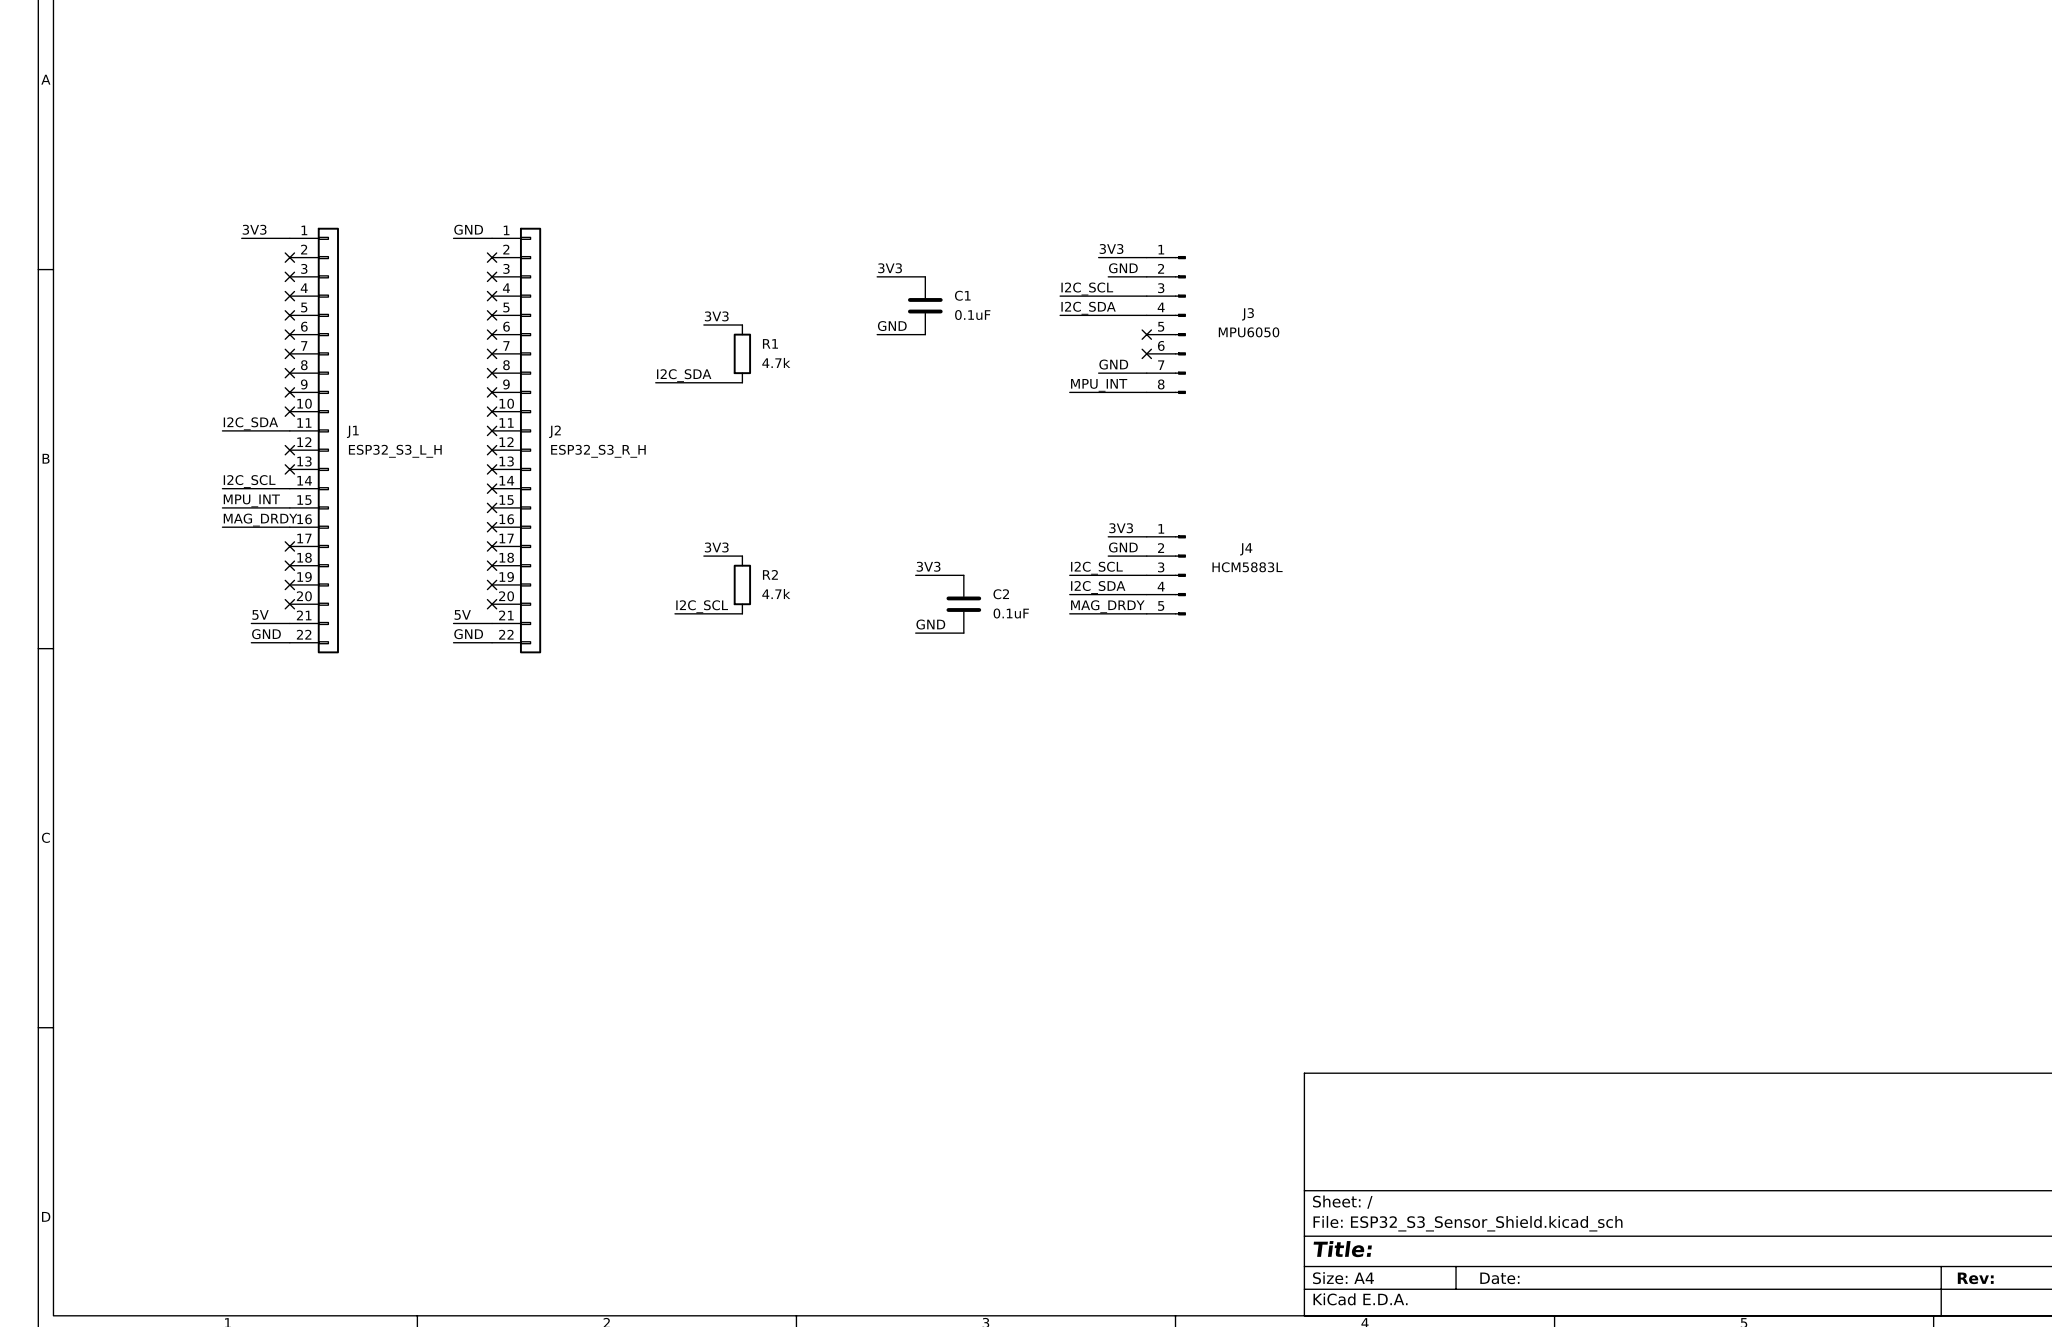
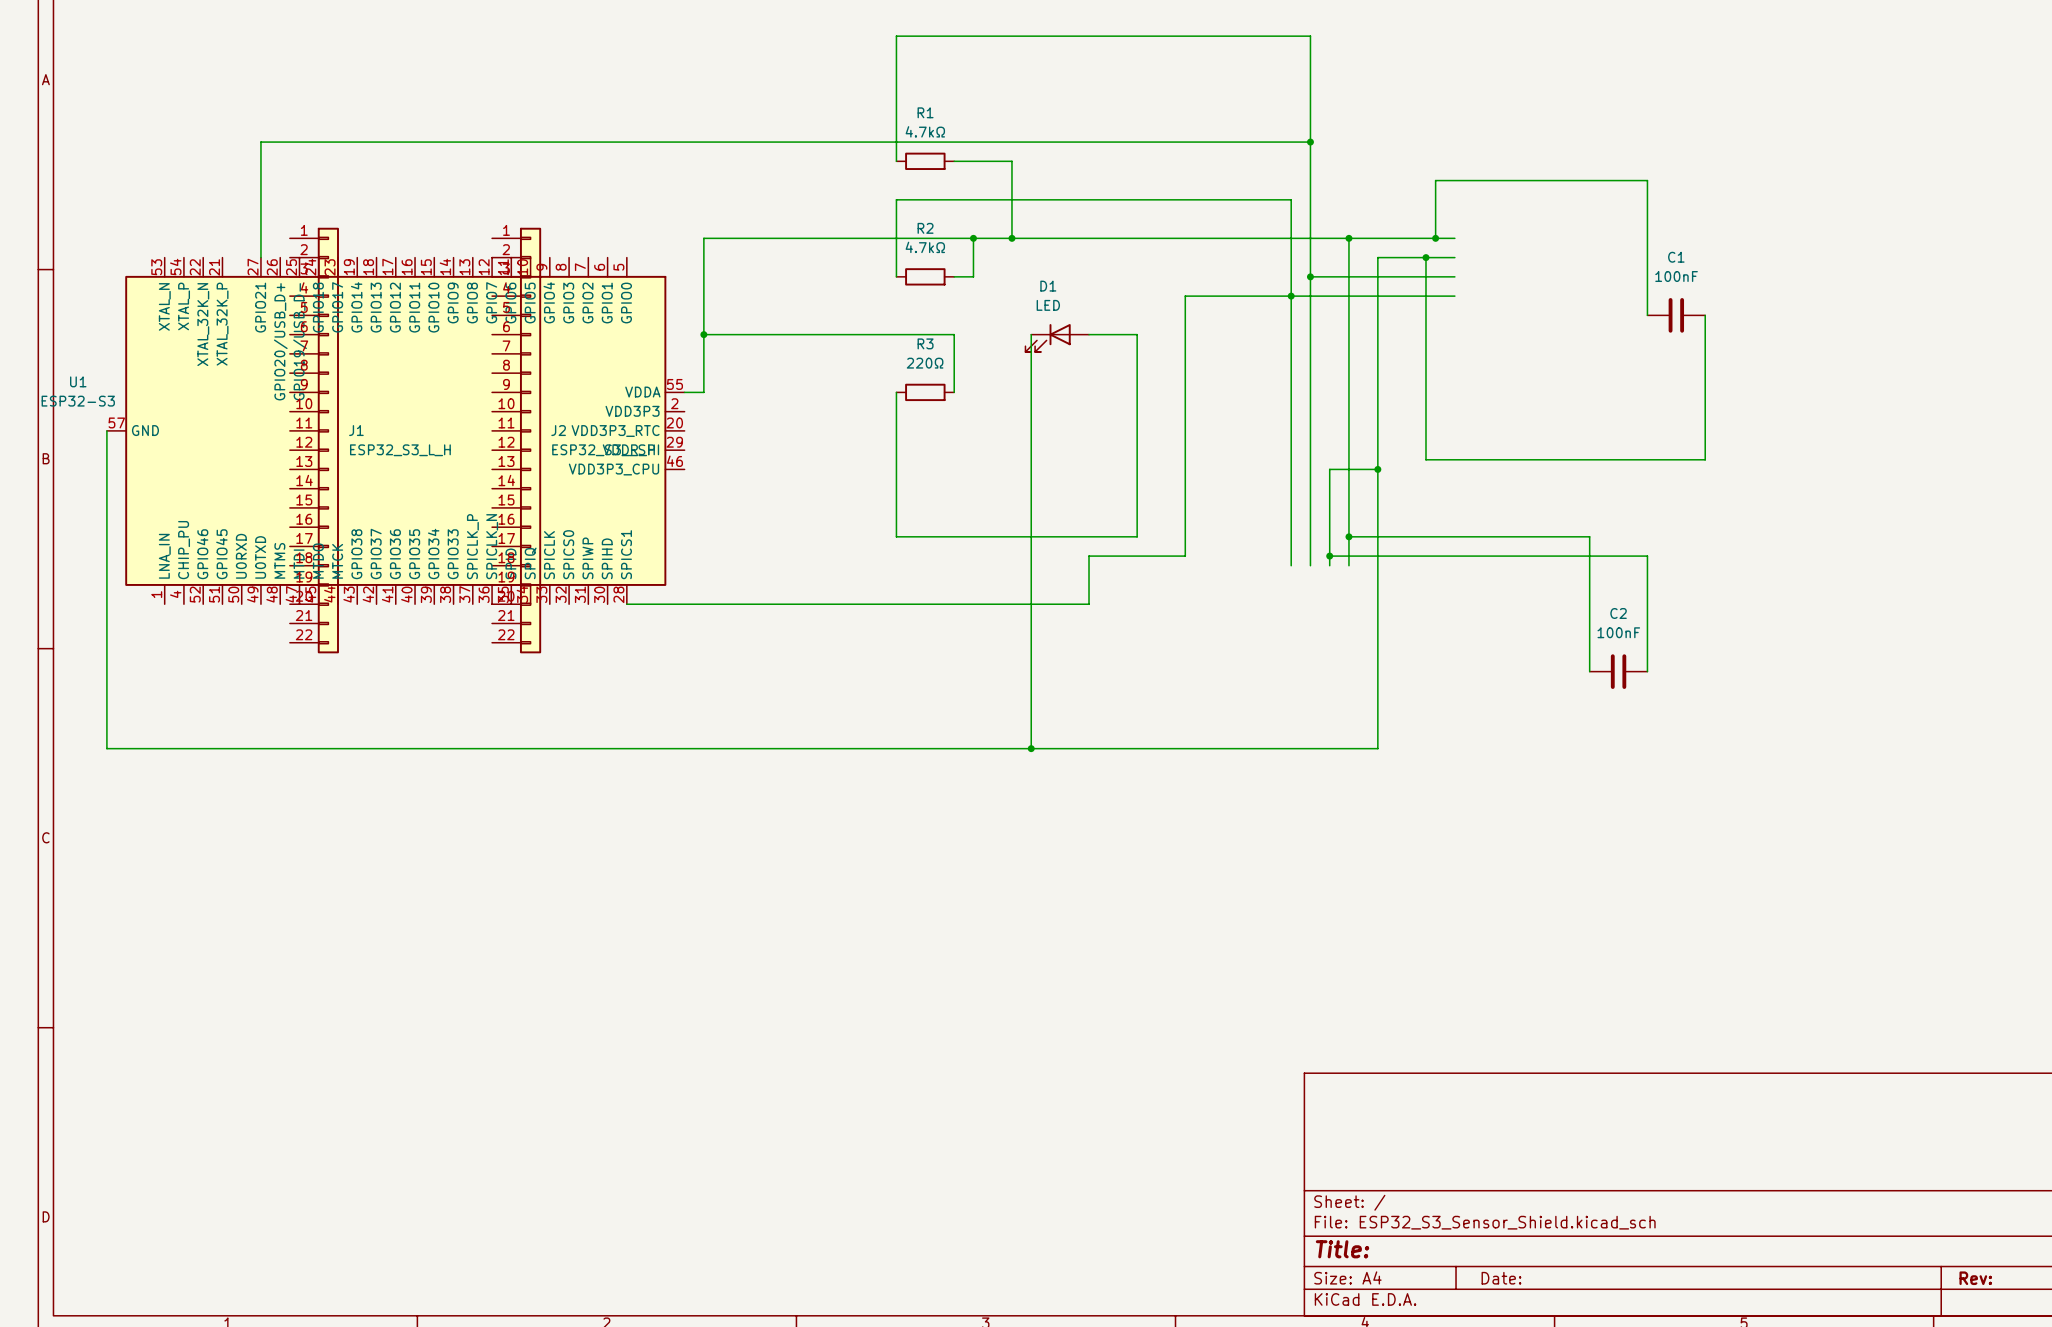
wire: none -> (1310, 142) (260, 142) (260, 257)
junction: none -> (1310, 142)
wire: none -> (896, 161) (896, 36) (1310, 36) (1310, 565)
wire: none -> (954, 161) (1011, 161) (1011, 238)
label: 3V3 (254, 229) -> none
label: GND (468, 229) -> none
wire: (241, 238) (289, 238) -> none
wire: (453, 238) (492, 238) -> none
wire: none -> (973, 238) (973, 276) (954, 276)
junction: none -> (973, 238)
junction: none -> (1011, 238)
wire: none -> (1348, 238) (1348, 565)
junction: none -> (1348, 238)
wire: none -> (1435, 238) (1435, 180) (1647, 180) (1647, 315)
junction: none -> (1435, 238)
wire: none -> (1454, 238) (703, 238) (703, 392) (684, 392)
label: 3V3 (1111, 249) -> none
no-connect mark: (289, 257) -> none
no-connect mark: (492, 257) -> none
wire: (1098, 257) (1146, 257) -> none
wire: none -> (1425, 257) (1425, 459) (1705, 459) (1705, 315)
junction: none -> (1425, 257)
wire: none -> (1454, 257) (1377, 257) (1377, 748) (106, 748) (106, 430)
label: 3V3 (890, 268) -> none
label: GND (1123, 268) -> none
no-connect mark: (289, 276) -> none
no-connect mark: (492, 276) -> none
wire: (877, 276) (925, 276) -> none
wire: none -> (896, 276) (896, 199) (1291, 199) (1291, 565)
wire: (1108, 276) (1146, 276) -> none
wire: none -> (1310, 276) (1454, 276)
junction: none -> (1310, 276)
label: I2C_SCL (1087, 288) -> none
C1 name position: C1 (962, 295) -> C1 (1676, 257)
no-connect mark: (289, 296) -> none
no-connect mark: (492, 296) -> none
wire: (1060, 296) (1146, 296) -> none
junction: none -> (1291, 296)
wire: none -> (1454, 296) (1185, 296) (1185, 556) (1146, 556)
C1 rotation: 0° (925, 305) -> 90° clockwise (1676, 315)
C1 position: (925, 305) -> (1676, 315)
label: I2C_SDA (1088, 308) -> none
no-connect mark: (289, 315) -> none
no-connect mark: (492, 315) -> none
C1 value: 0.1uF (972, 315) -> 100nF (1676, 276)
wire: (1060, 315) (1146, 315) -> none
label: 3V3 (716, 316) -> none
wire: (703, 325) (742, 325) -> none
J3: MPU6050 (1166, 325) -> none
label: GND (892, 326) -> none
no-connect mark: (289, 334) -> none
no-connect mark: (492, 334) -> none
wire: none -> (703, 334) (877, 334)
junction: none -> (703, 334)
wire: none -> (925, 334) (954, 334) (954, 392)
wire: none -> (1031, 334) (1031, 748)
no-connect mark: (1146, 334) -> none
D1: none -> LED (1057, 338)
R1 name position: R1 (770, 343) -> R1 (925, 112)
no-connect mark: (289, 353) -> none
no-connect mark: (492, 353) -> none
R1 rotation: 0° (742, 353) -> 90° clockwise (925, 161)
R1 position: (742, 353) -> (925, 161)
no-connect mark: (1146, 353) -> none
R1 value: 4.7k (776, 362) -> 4.7kΩ (925, 131)
label: GND (1113, 364) -> none
no-connect mark: (289, 373) -> none
no-connect mark: (492, 373) -> none
wire: (1098, 373) (1146, 373) -> none
label: I2C_SDA (684, 375) -> none
wire: (655, 382) (742, 382) -> none
label: MPU_INT (1099, 385) -> none
no-connect mark: (289, 392) -> none
no-connect mark: (492, 392) -> none
wire: none -> (896, 392) (896, 536) (1108, 536)
R3: none -> 220Ω (925, 392)
wire: (1069, 392) (1146, 392) -> none
no-connect mark: (289, 411) -> none
no-connect mark: (492, 411) -> none
label: I2C_SDA (250, 423) -> none
U1: none -> ESP32-S3 (395, 430)
no-connect mark: (492, 430) -> none
no-connect mark: (289, 450) -> none
no-connect mark: (492, 450) -> none
no-connect mark: (289, 469) -> none
no-connect mark: (492, 469) -> none
wire: none -> (1377, 469) (1329, 469) (1329, 565)
junction: none -> (1377, 469)
label: I2C_SCL (249, 481) -> none
no-connect mark: (492, 488) -> none
label: MPU_INT (251, 500) -> none
no-connect mark: (492, 507) -> none
label: MAG_DRDY (260, 520) -> none
no-connect mark: (492, 527) -> none
label: 3V3 (1121, 528) -> none
wire: (1137, 536) (1146, 536) -> (1137, 536) (1137, 334) (1089, 334)
wire: none -> (1348, 536) (1589, 536) (1589, 671)
junction: none -> (1348, 536)
no-connect mark: (289, 546) -> none
no-connect mark: (492, 546) -> none
label: 3V3 (716, 547) -> none
label: GND (1123, 547) -> none
wire: (703, 556) (742, 556) -> none
wire: none -> (1108, 556) (1089, 556) (1089, 604) (626, 604)
wire: none -> (1329, 556) (1647, 556) (1647, 671)
junction: none -> (1329, 556)
no-connect mark: (289, 565) -> none
no-connect mark: (492, 565) -> none
label: 3V3 (928, 566) -> none
label: I2C_SCL (1096, 568) -> none
R2 name position: R2 (770, 574) -> R2 (925, 228)
wire: (915, 575) (963, 575) -> none
wire: (1069, 575) (1146, 575) -> none
J4: HCM5883L (1166, 575) -> none
no-connect mark: (289, 584) -> none
no-connect mark: (492, 584) -> none
R2 rotation: 0° (742, 584) -> 90° clockwise (925, 276)
R2 position: (742, 584) -> (925, 276)
label: I2C_SDA (1098, 587) -> none
R2 value: 4.7k (776, 594) -> 4.7kΩ (925, 247)
C2 name position: C2 (1001, 594) -> C2 (1618, 613)
wire: (1069, 594) (1146, 594) -> none
no-connect mark: (289, 604) -> none
no-connect mark: (492, 604) -> none
C2 rotation: 0° (963, 604) -> 90° clockwise (1618, 671)
C2 position: (963, 604) -> (1618, 671)
label: I2C_SCL (702, 606) -> none
label: MAG_DRDY (1107, 606) -> none
wire: (674, 613) (742, 613) -> none
C2 value: 0.1uF (1011, 613) -> 100nF (1618, 632)
wire: (1069, 613) (1146, 613) -> none
label: 5V (260, 614) -> none
label: 5V (462, 614) -> none
wire: (251, 623) (289, 623) -> none
wire: (453, 623) (492, 623) -> none
label: GND (930, 624) -> none
wire: (915, 633) (963, 633) -> none
label: GND (266, 634) -> none
label: GND (468, 634) -> none
wire: (251, 642) (289, 642) -> none
wire: (453, 642) (492, 642) -> none
junction: none -> (1031, 748)

